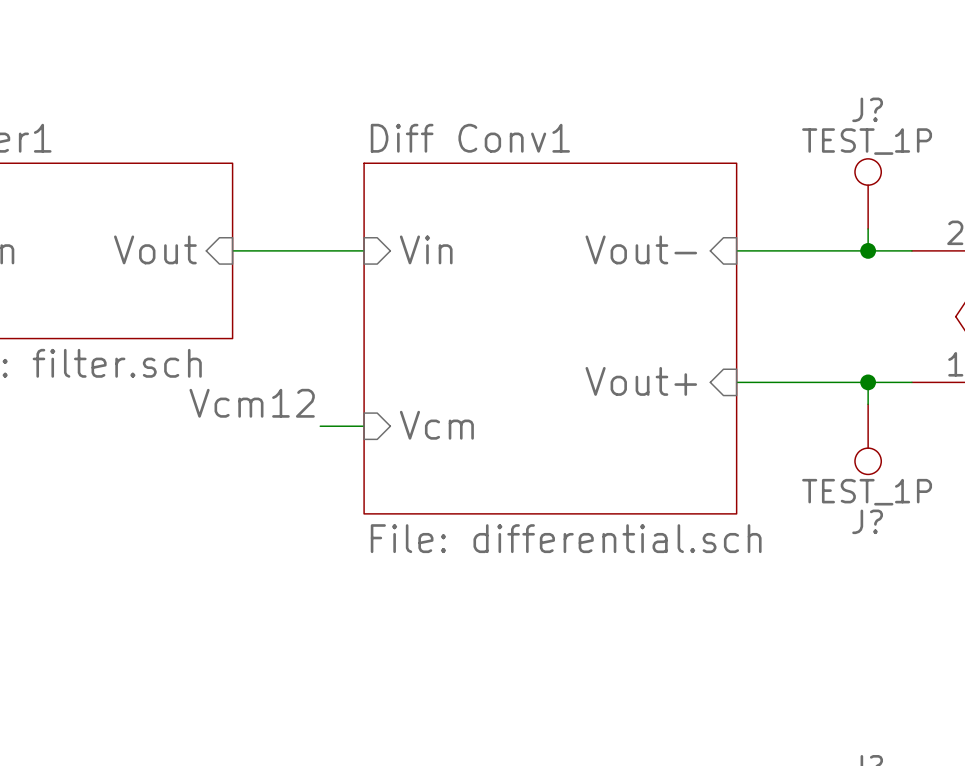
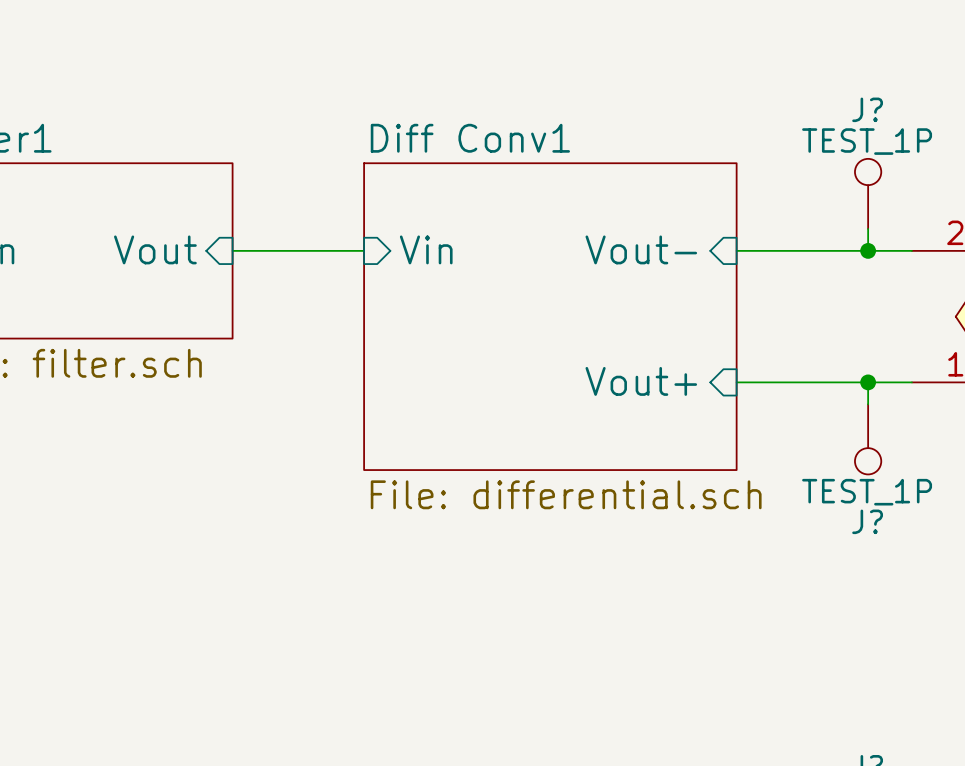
sheet Diff Conv1 shape: [364, 163, 737, 514] -> [364, 163, 737, 471]
label: Vcm12 (252, 403) -> none
sheet pin: Vcm (436, 425) -> none
wire: (320, 426) (364, 426) -> none

